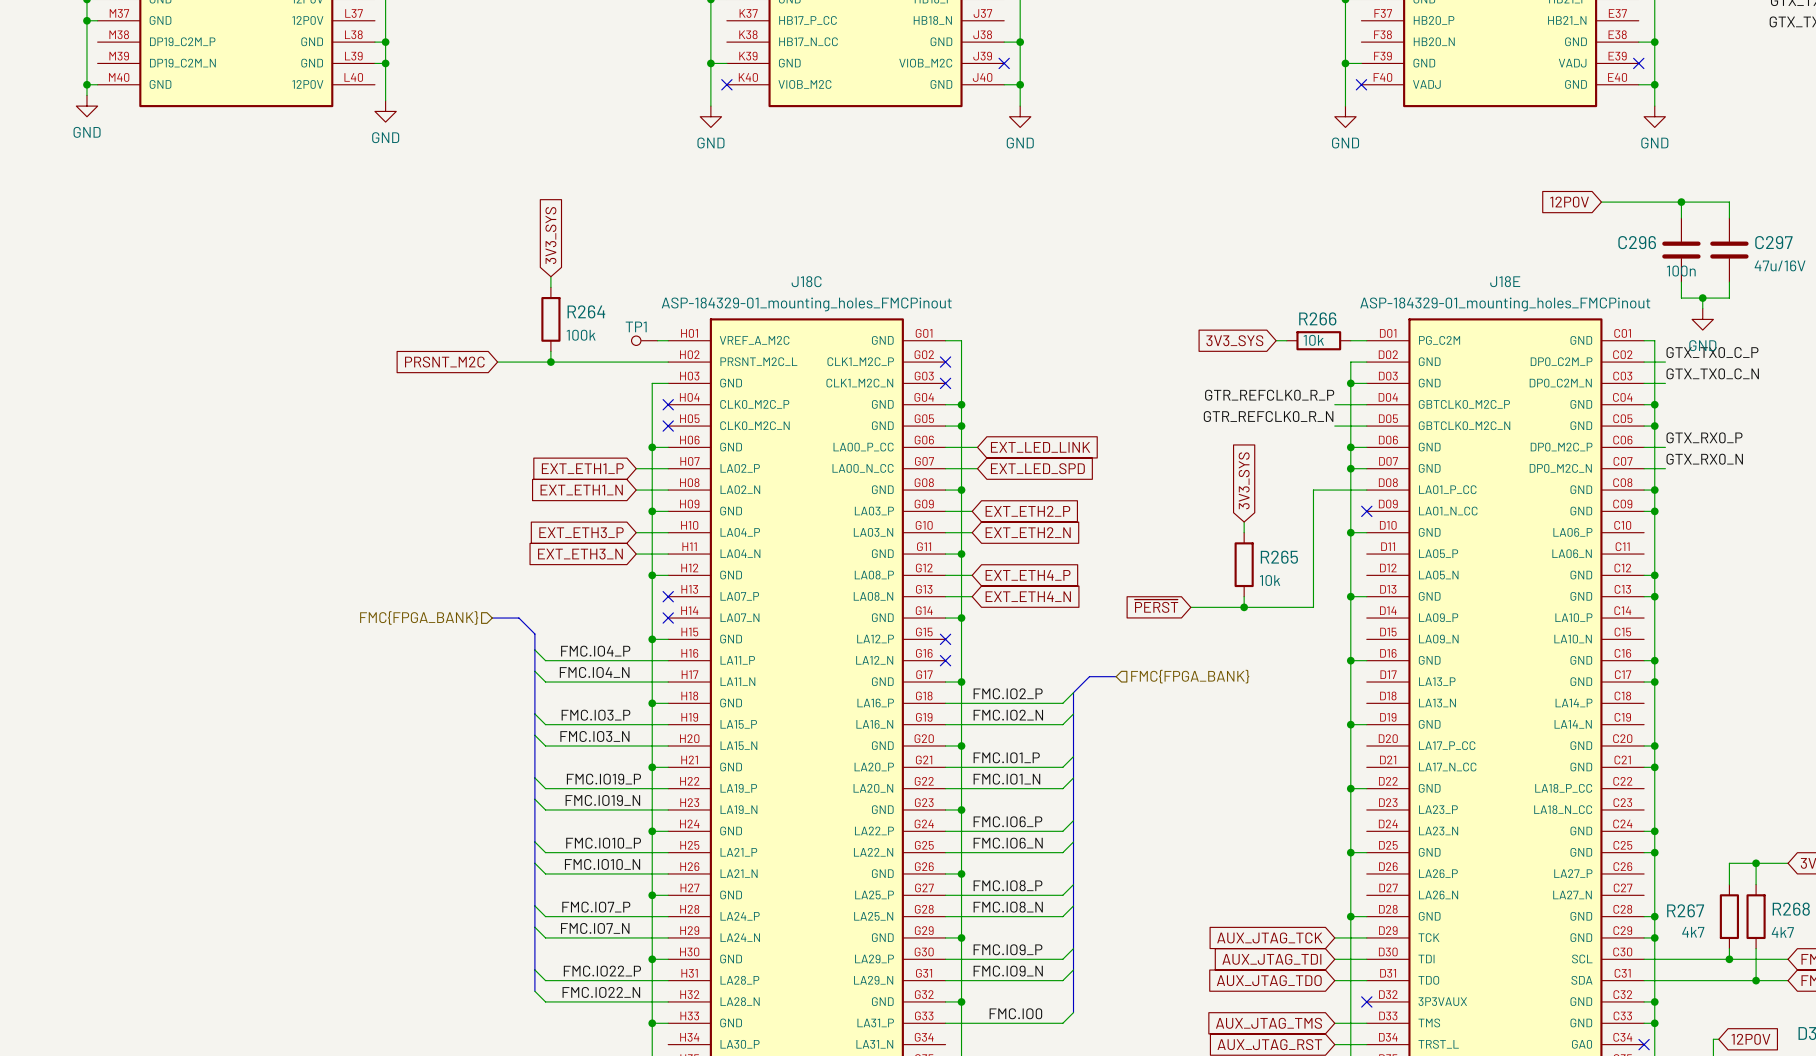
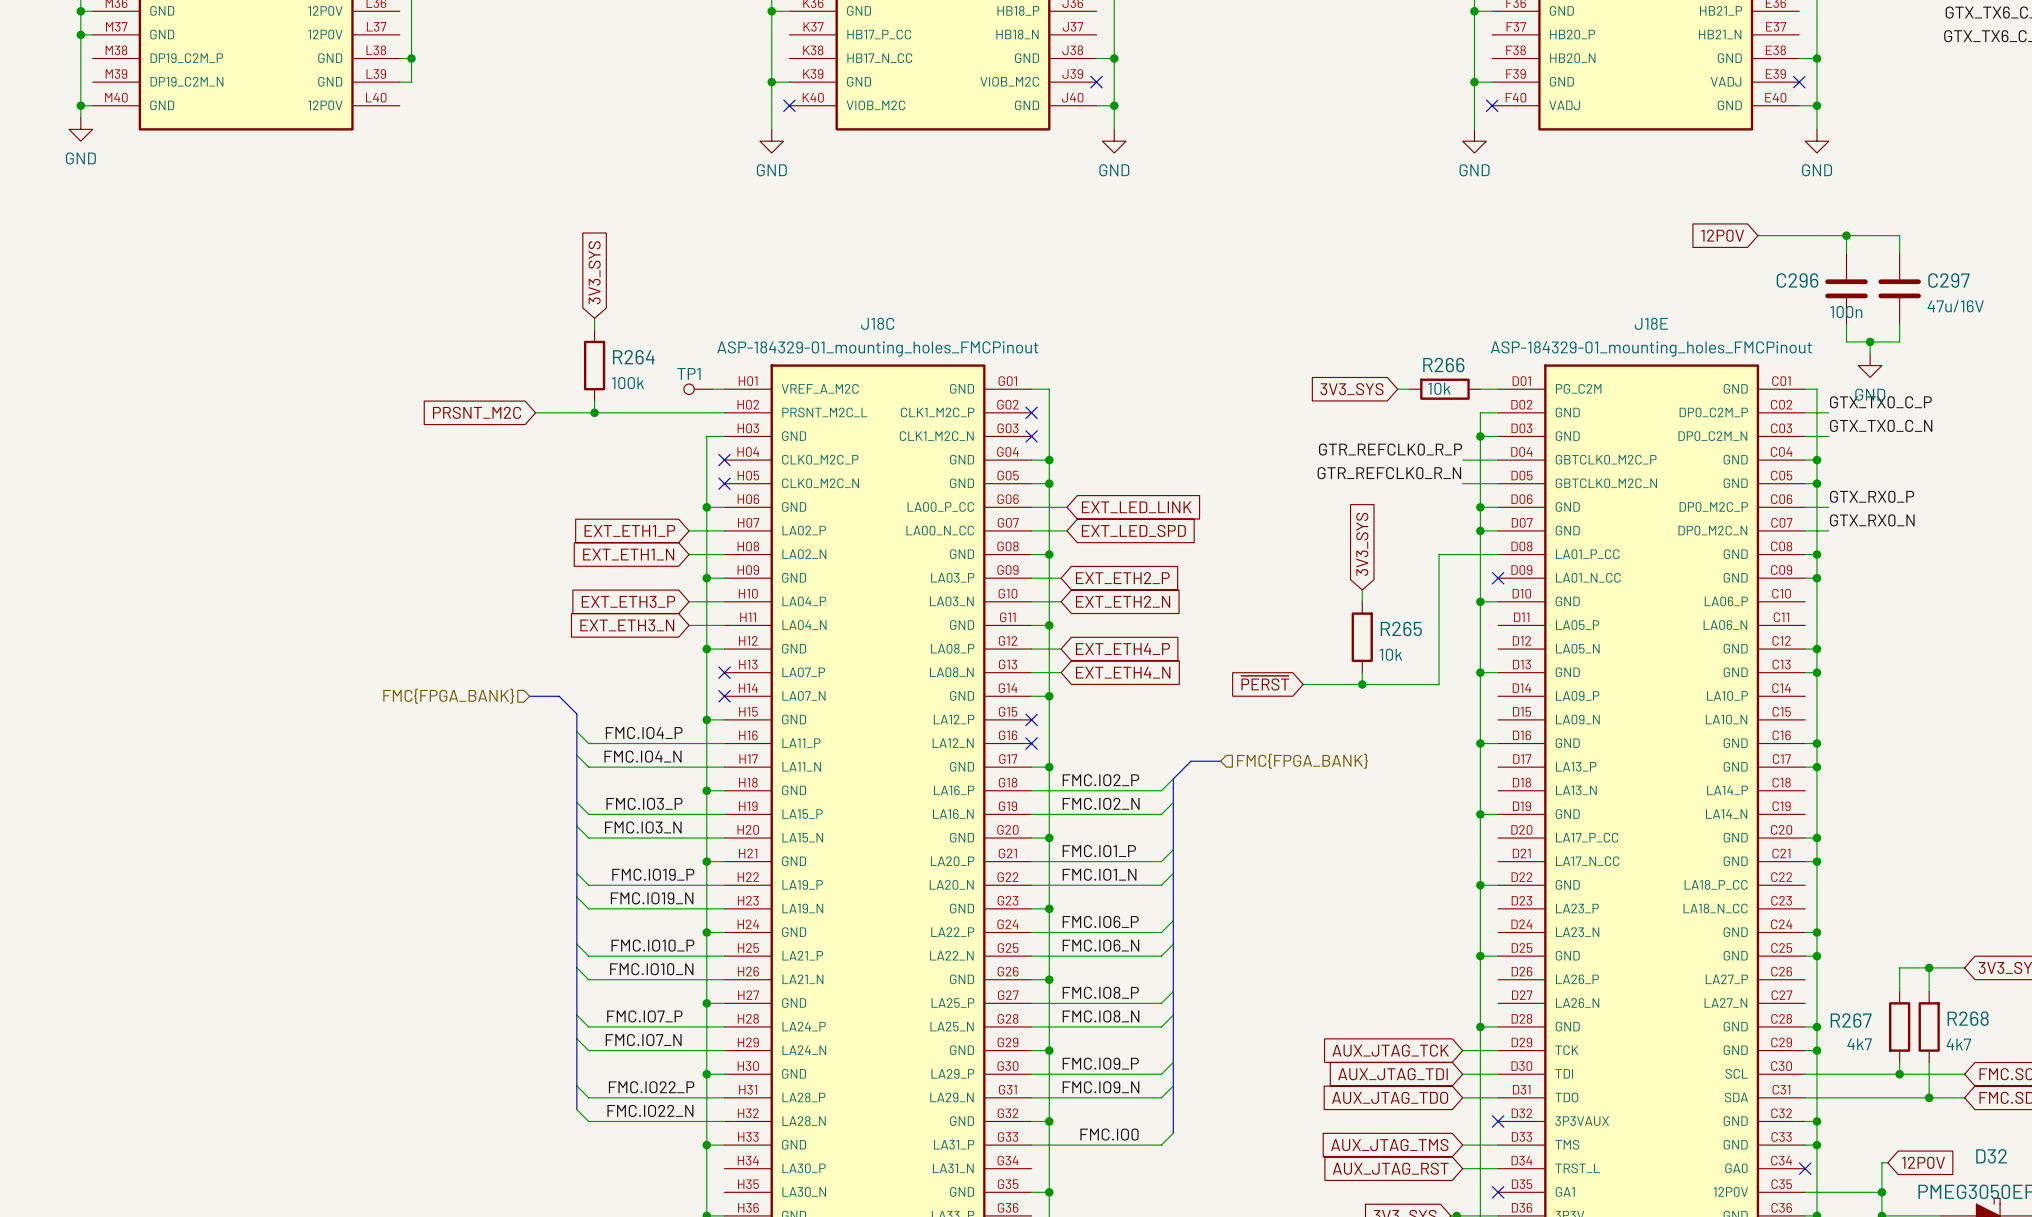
wire: (385, 63) (385, 100) -> none
junction: (385, 63) -> none
power symbol: GND (385, 111) -> none

